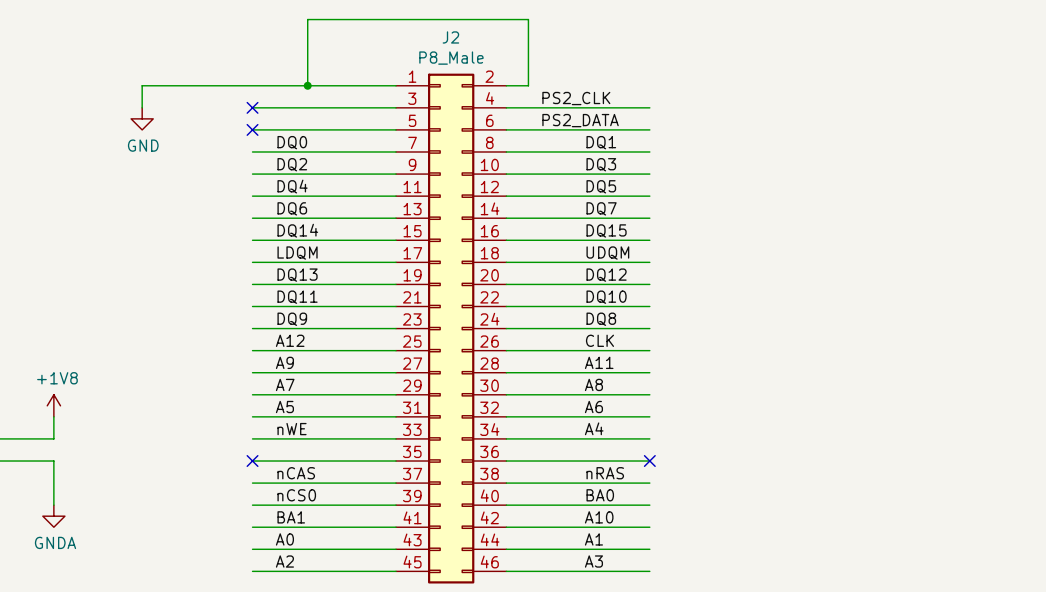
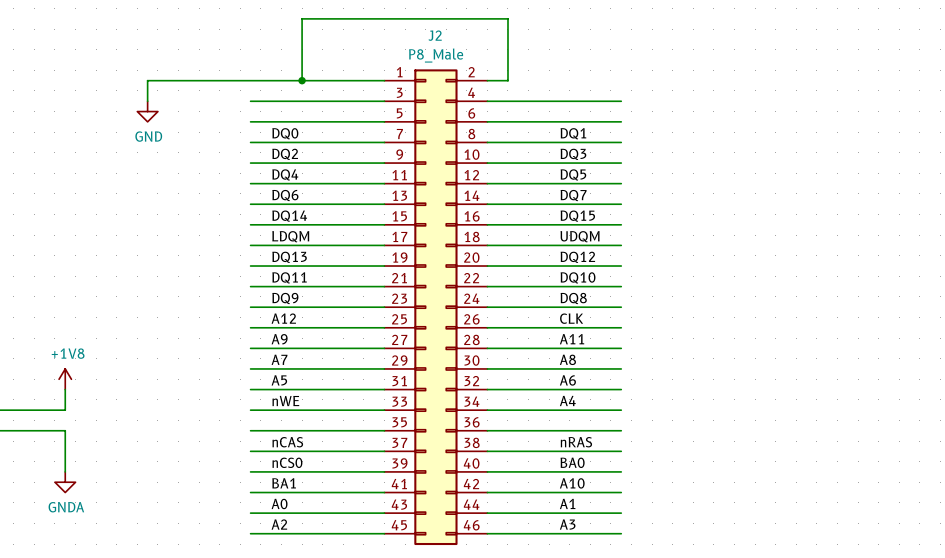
label: PS2_CLK (576, 98) -> none
no-connect mark: (252, 107) -> none
label: PS2_DATA (580, 120) -> none
no-connect mark: (252, 129) -> none
no-connect mark: (252, 461) -> none
no-connect mark: (649, 461) -> none

